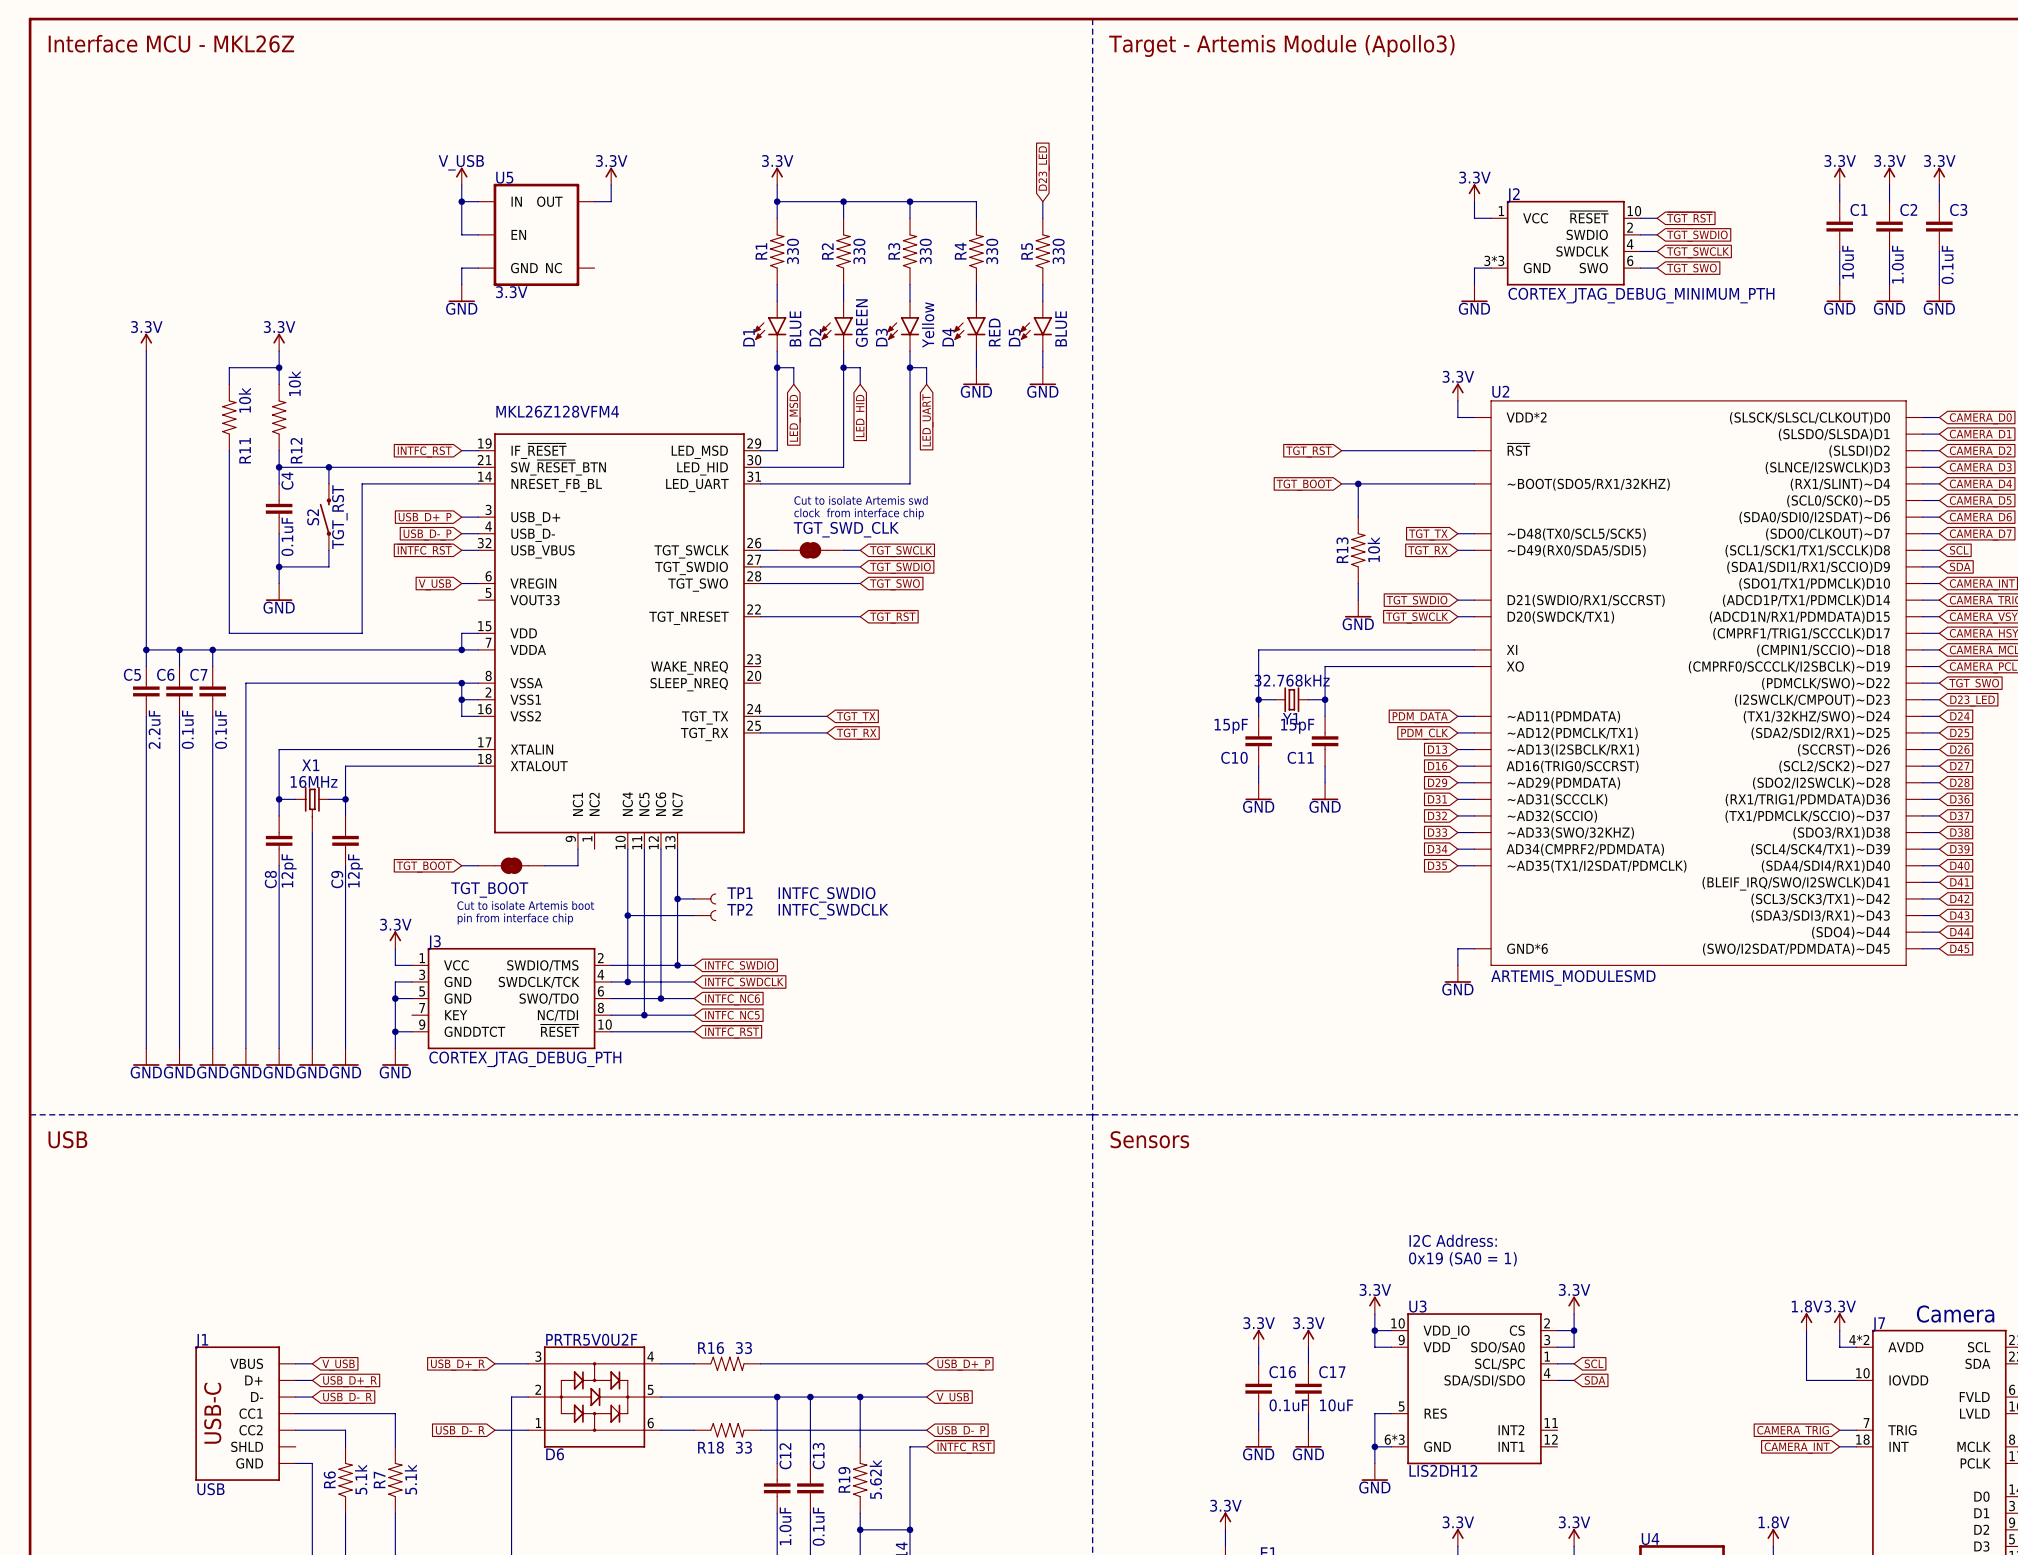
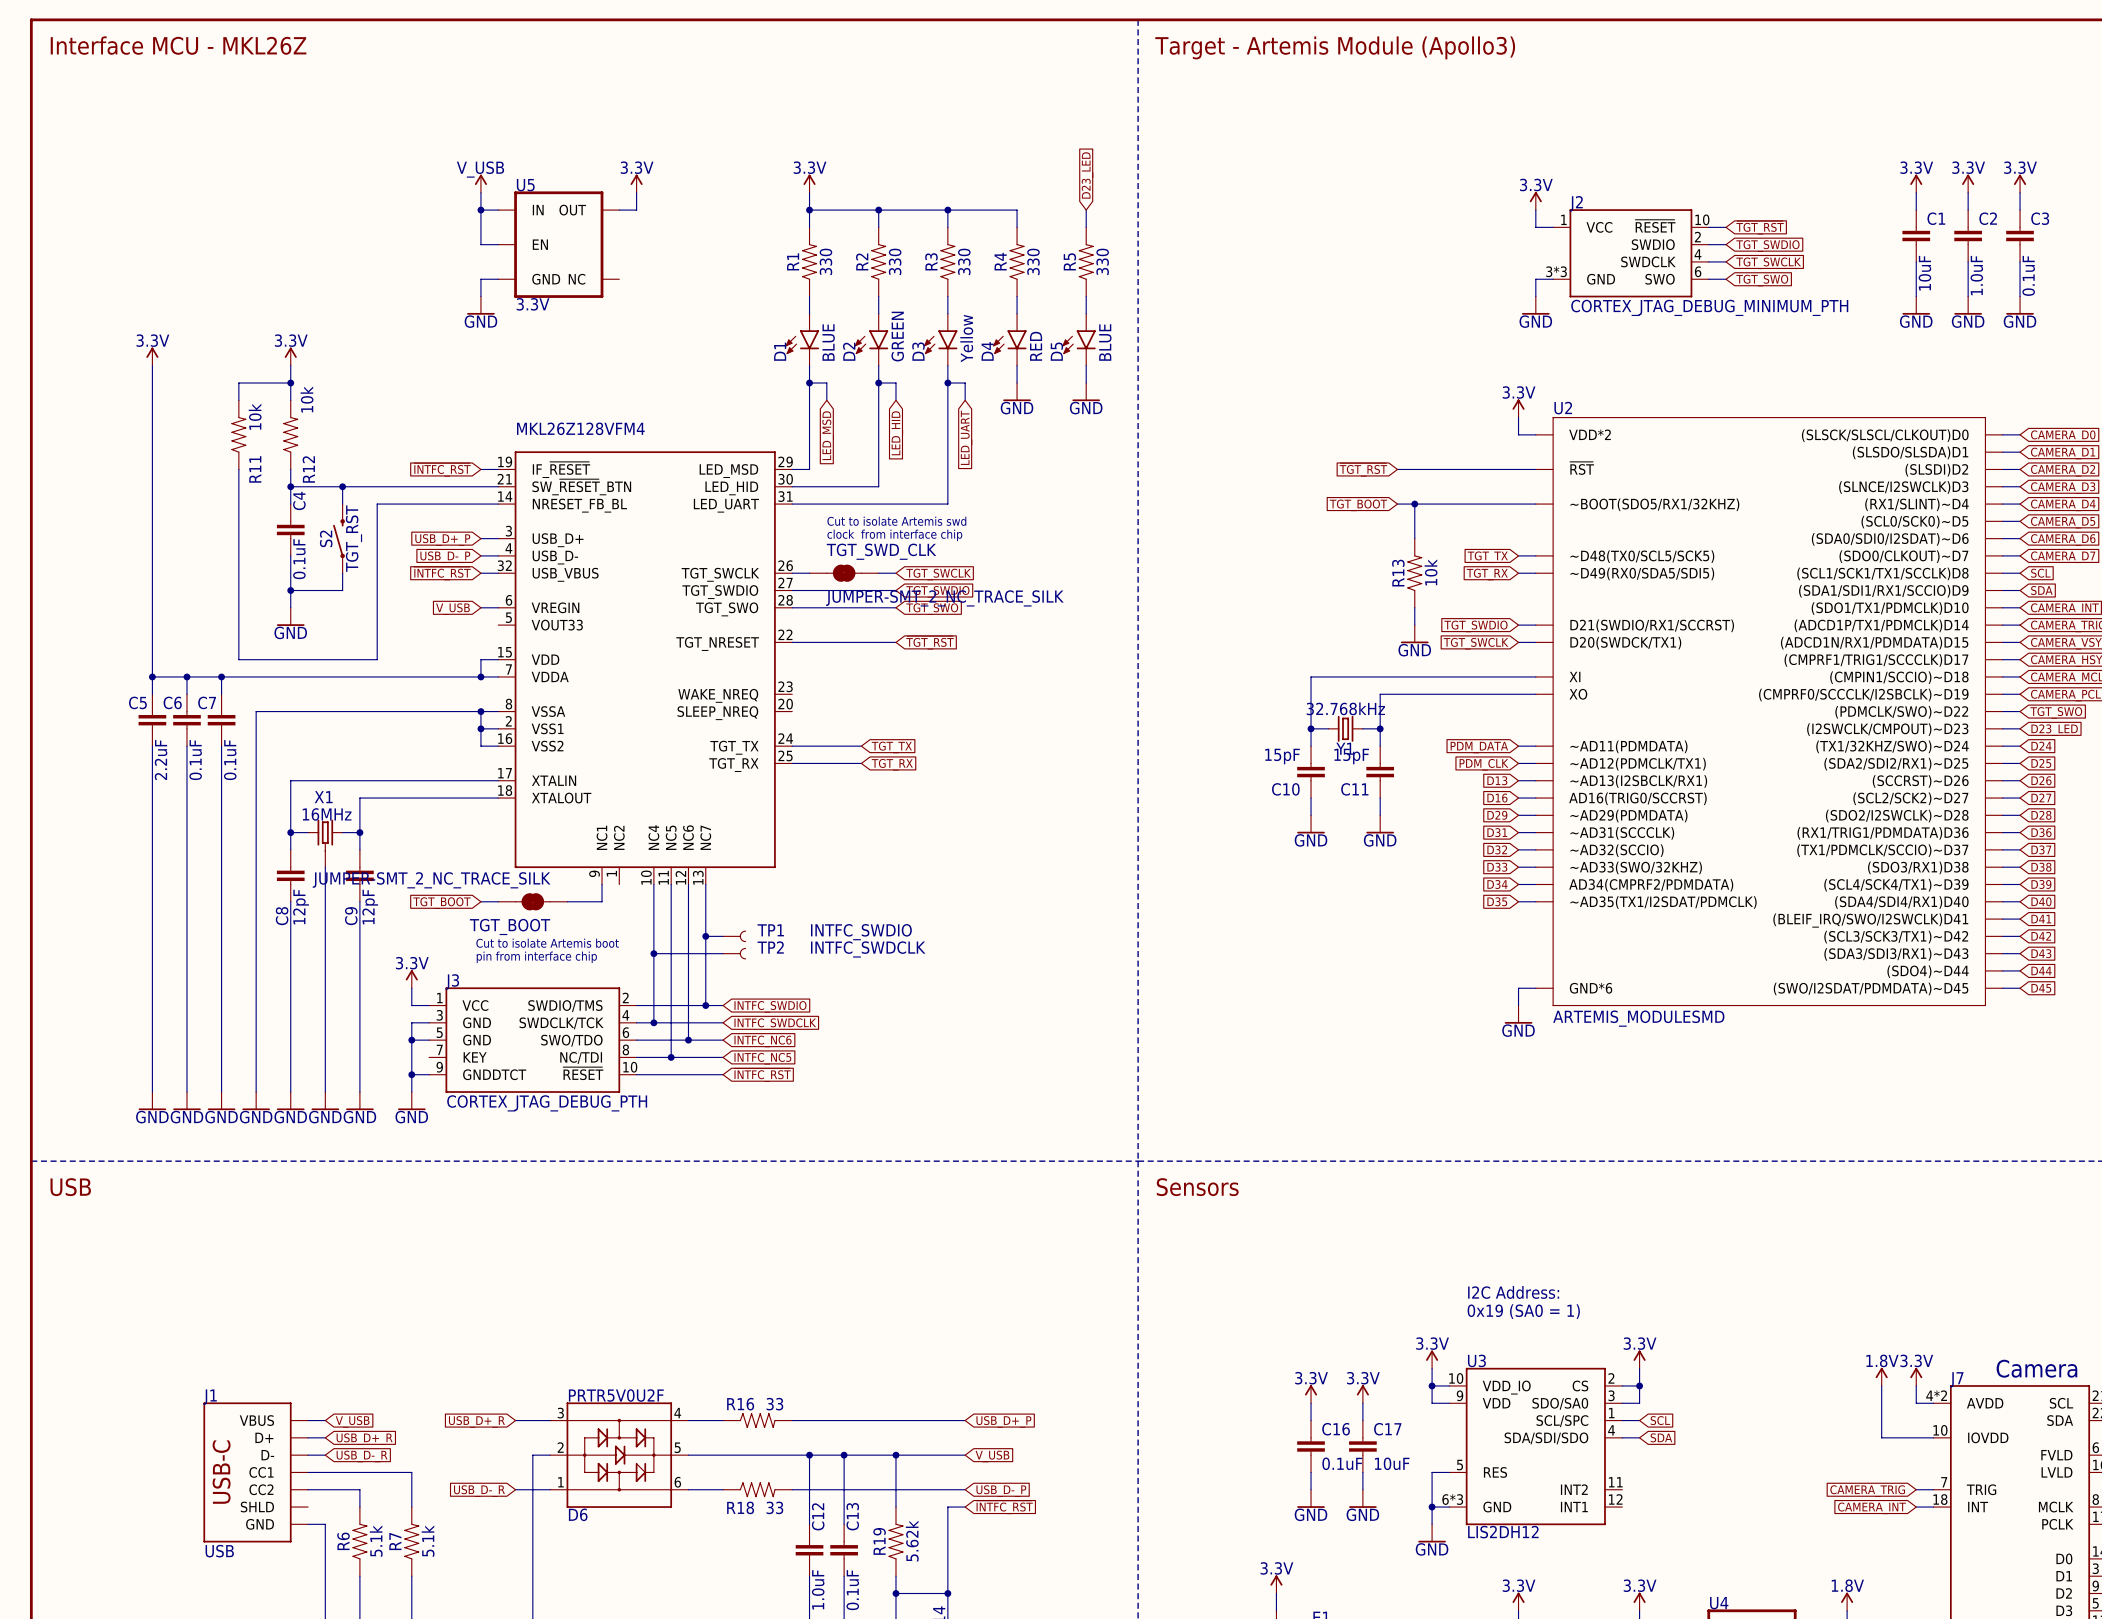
TGT_SWD_CLK value: none -> JUMPER-SMT_2_NC_TRACE_SILK (944, 598)
TGT_BOOT value: none -> JUMPER-SMT_2_NC_TRACE_SILK (431, 880)

